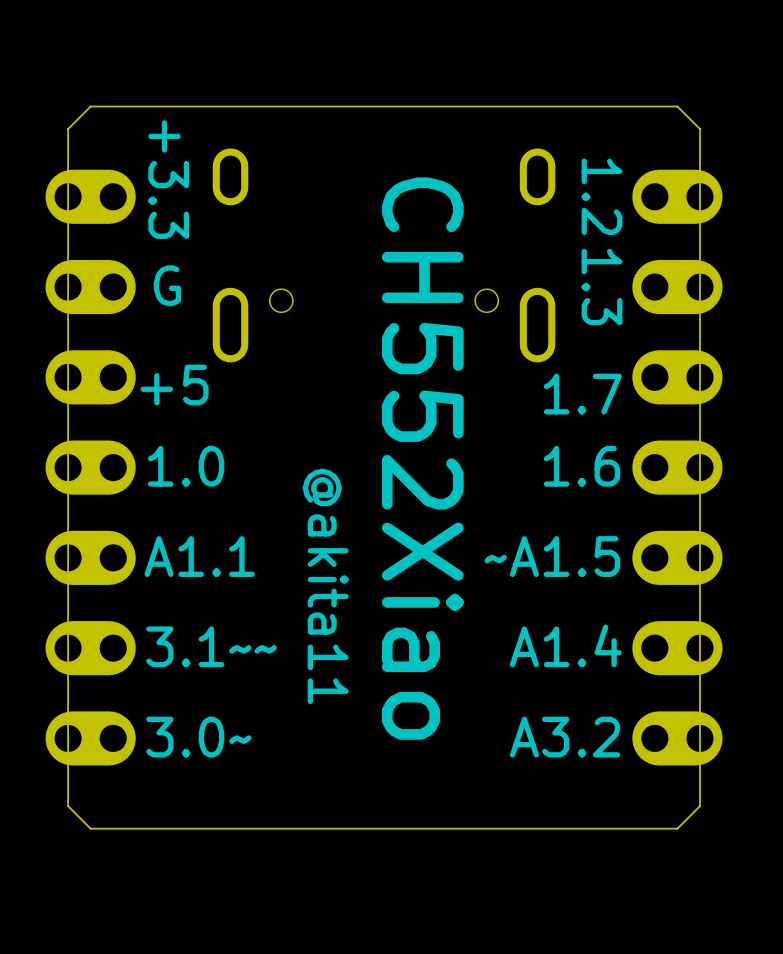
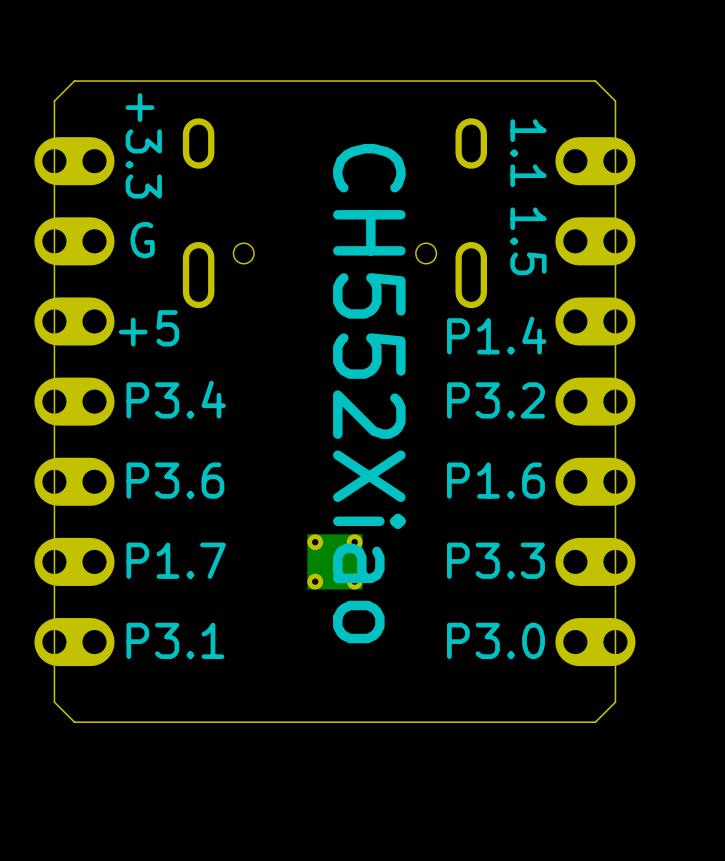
text: 1.2 (602, 196) -> 1.1 (528, 153)
text: 1.3 (602, 287) -> 1.5 (528, 241)
text: none -> P1.4 (496, 335)
text: 1.7 (582, 394) -> none
text: none -> P3.4 (176, 399)
text: 1.0 (186, 466) -> none
text: none -> P3.2 (495, 400)
text: 1.6 (581, 466) -> none
text: A1.1 (199, 556) -> none
text: none -> P3.6 (175, 480)
text: ~A1.5 (552, 556) -> none
text: none -> P1.6 (495, 480)
text: @akita11 (325, 586) -> none
text: A1.4 (565, 645) -> none
text: none -> P1.7 (176, 560)
text: 3.1~~ (211, 646) -> none
text: none -> P3.3 (495, 560)
part: none -> (334, 561)
text: 3.0~ (198, 737) -> none
text: none -> P3.1 (175, 640)
text: A3.2 (565, 737) -> none
text: none -> P3.0 (495, 640)

